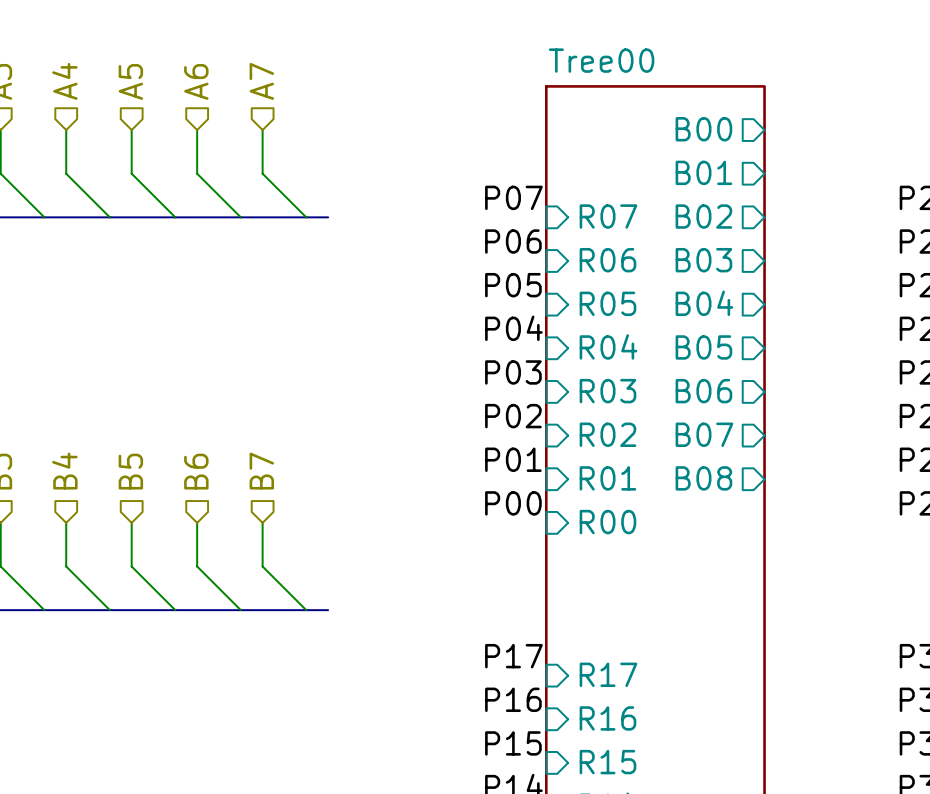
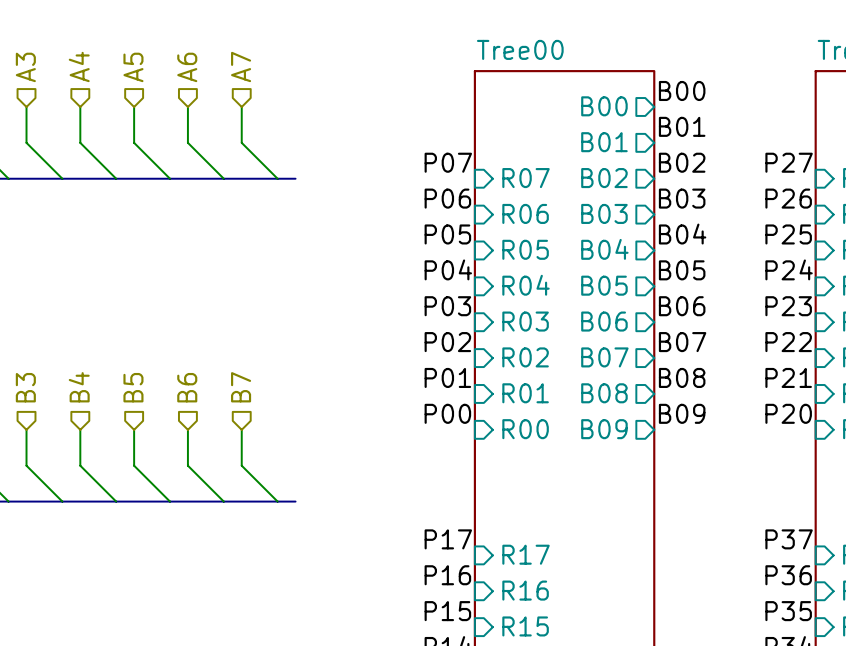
label: none -> B00 (682, 90)
label: none -> B01 (682, 126)
label: none -> B02 (682, 162)
label: none -> B03 (682, 198)
label: none -> B04 (682, 234)
label: none -> B05 (682, 270)
label: none -> B06 (682, 306)
label: none -> B07 (682, 342)
label: none -> B08 (682, 377)
label: none -> B09 (682, 413)
sheet pin: none -> B09 (604, 429)

